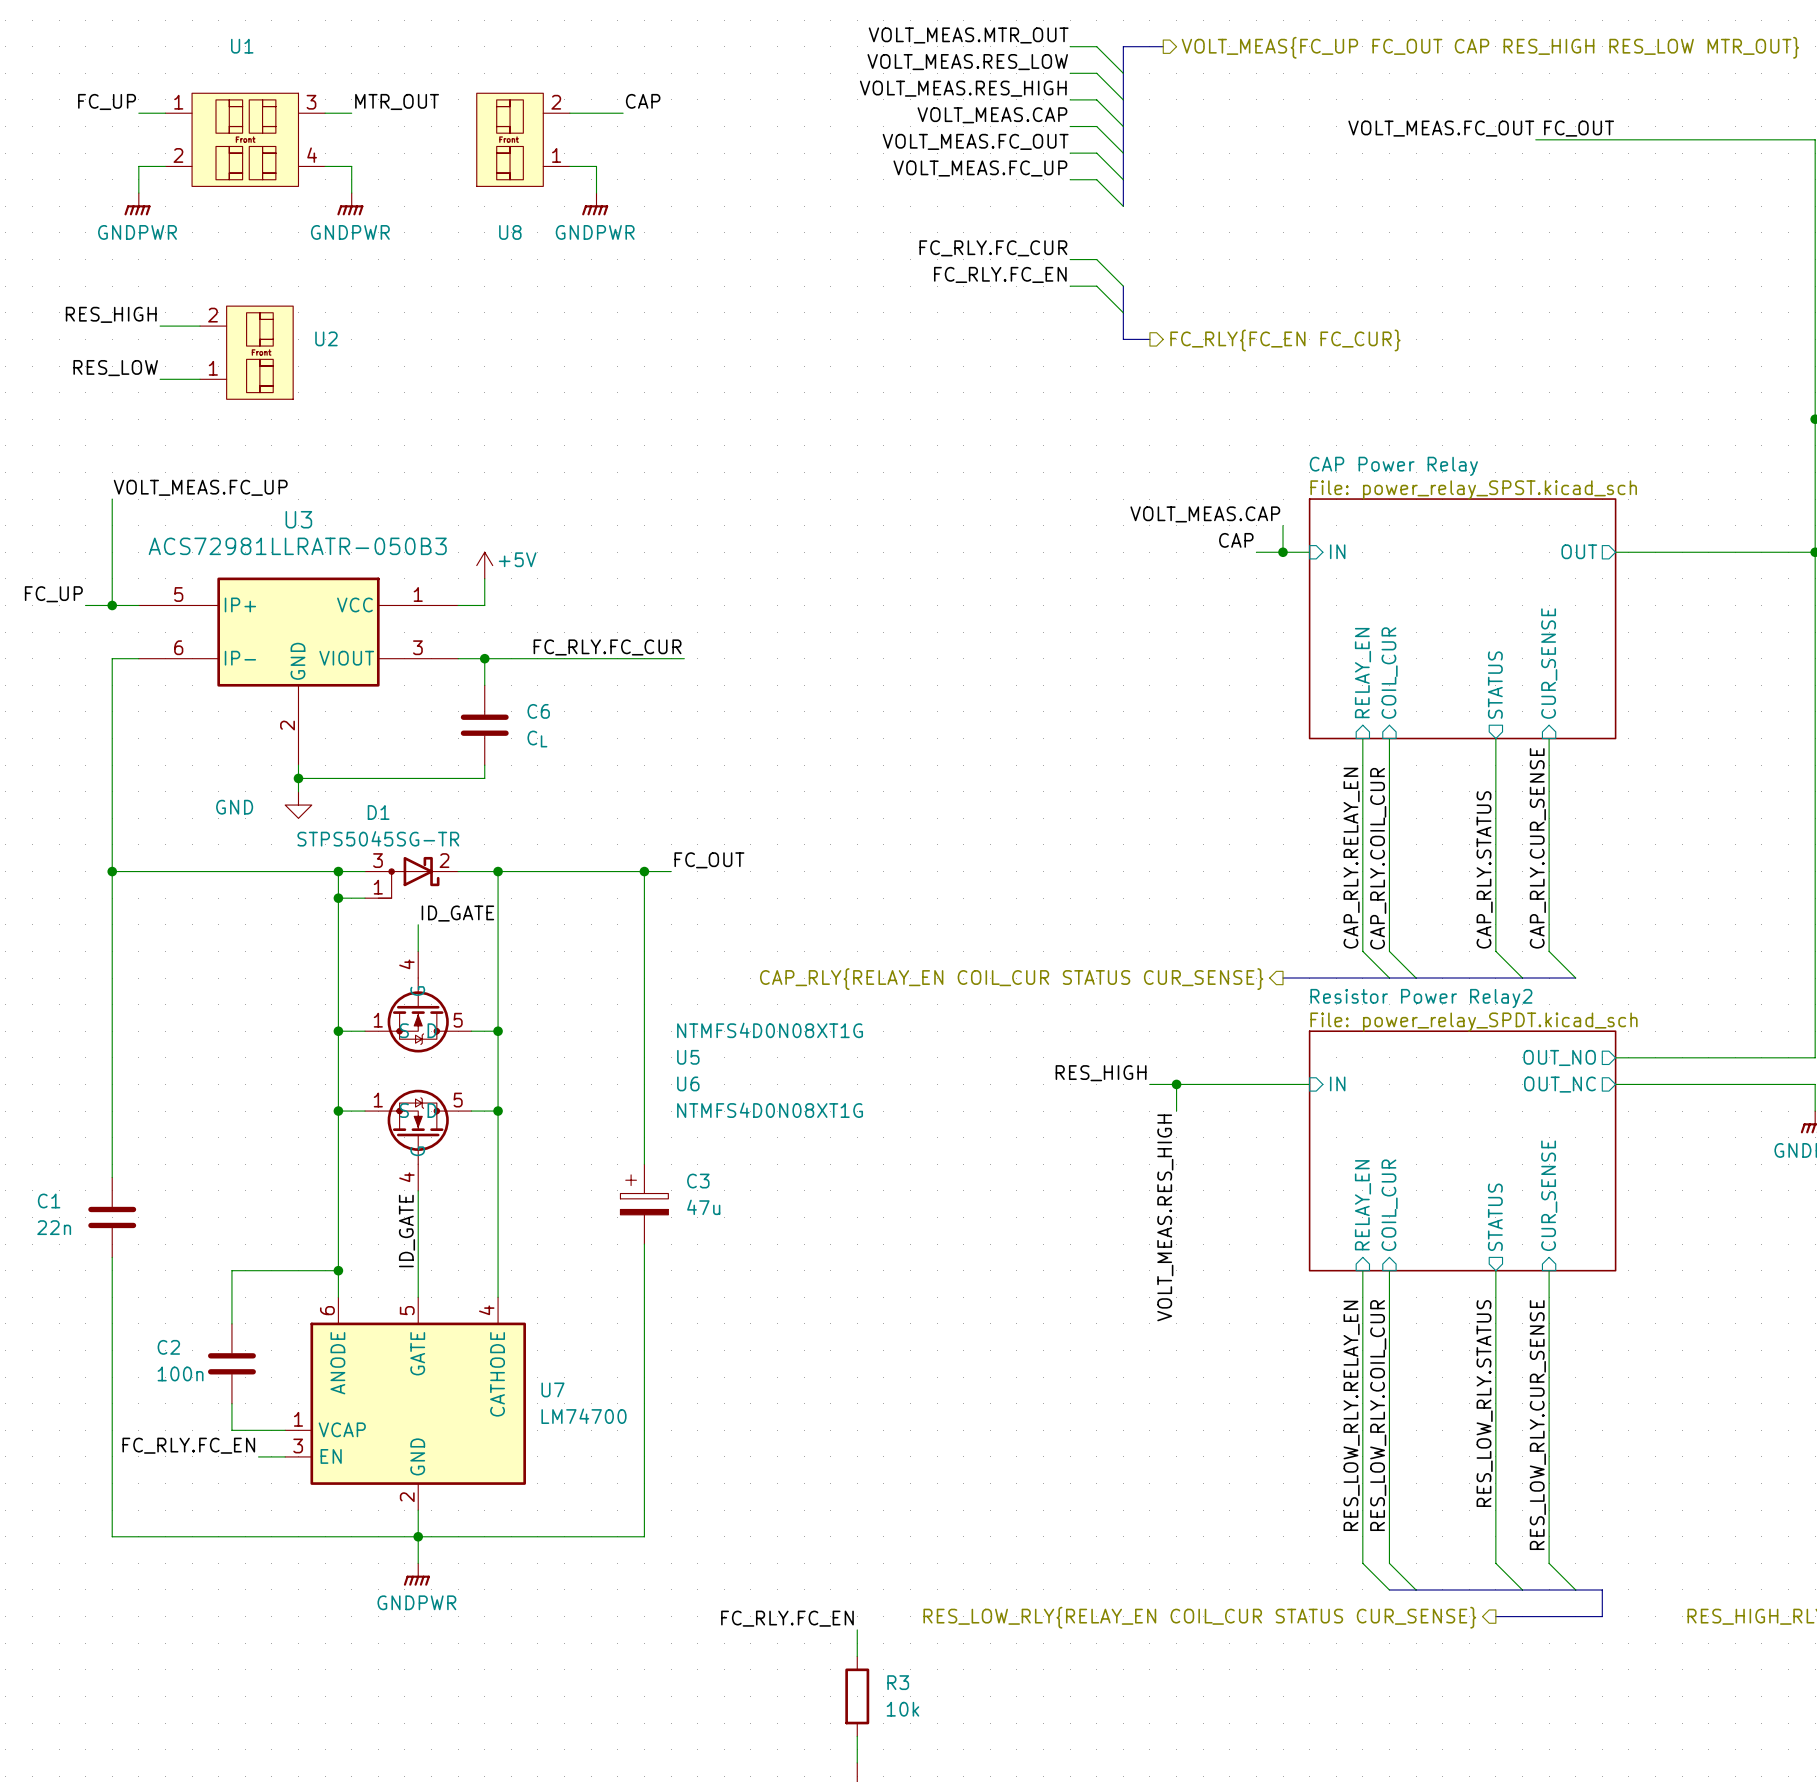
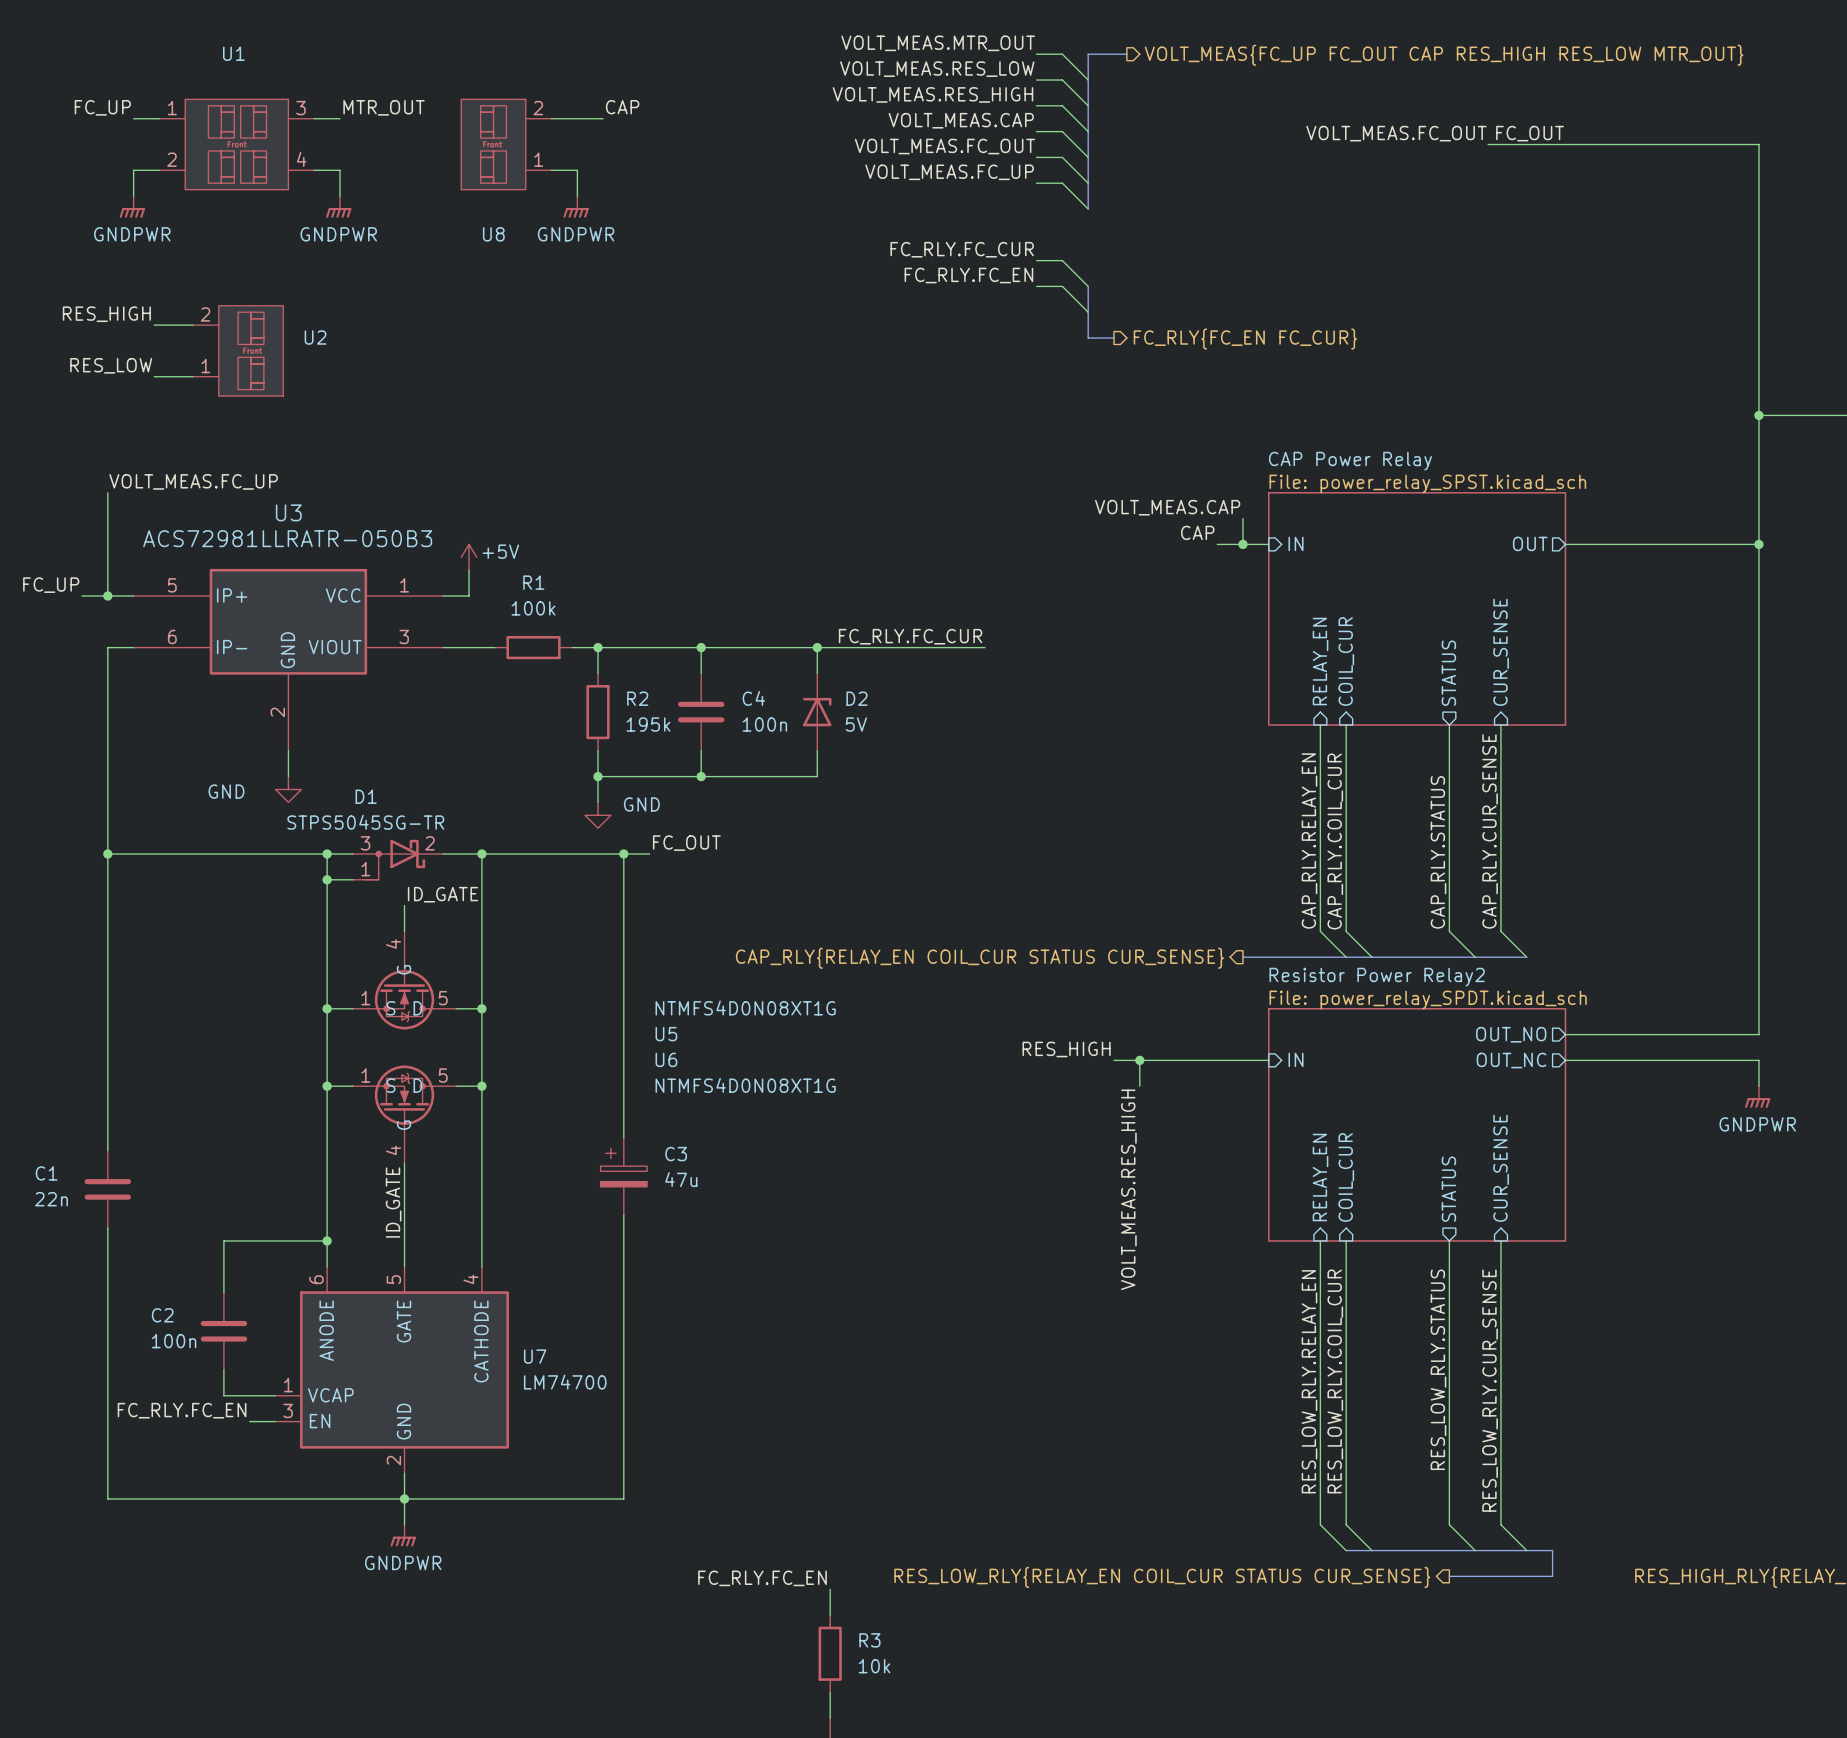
label: FC_RLY.FC_CUR (607, 647) -> none
label: none -> FC_RLY.FC_CUR (910, 636)
wire: (484, 658) (484, 685) -> (598, 647) (598, 673)
junction: (484, 658) -> none
wire: (511, 658) (591, 658) -> none
R1: none -> 100k (533, 647)
junction: none -> (598, 647)
wire: none -> (662, 647) (984, 647)
wire: none -> (701, 647) (701, 673)
junction: none -> (701, 647)
wire: none -> (817, 647) (817, 673)
junction: none -> (817, 647)
C6: CL (484, 725) -> none
R2: none -> 195k (598, 712)
C4: none -> 100n (701, 712)
D2: none -> 5V (817, 712)
wire: (484, 765) (484, 778) (298, 778) -> none
wire: none -> (598, 750) (598, 802)
wire: none -> (701, 750) (701, 776)
wire: none -> (817, 750) (817, 776) (598, 776)
junction: (298, 778) -> none
junction: none -> (598, 776)
junction: none -> (701, 776)
power symbol: none -> GND (598, 815)

